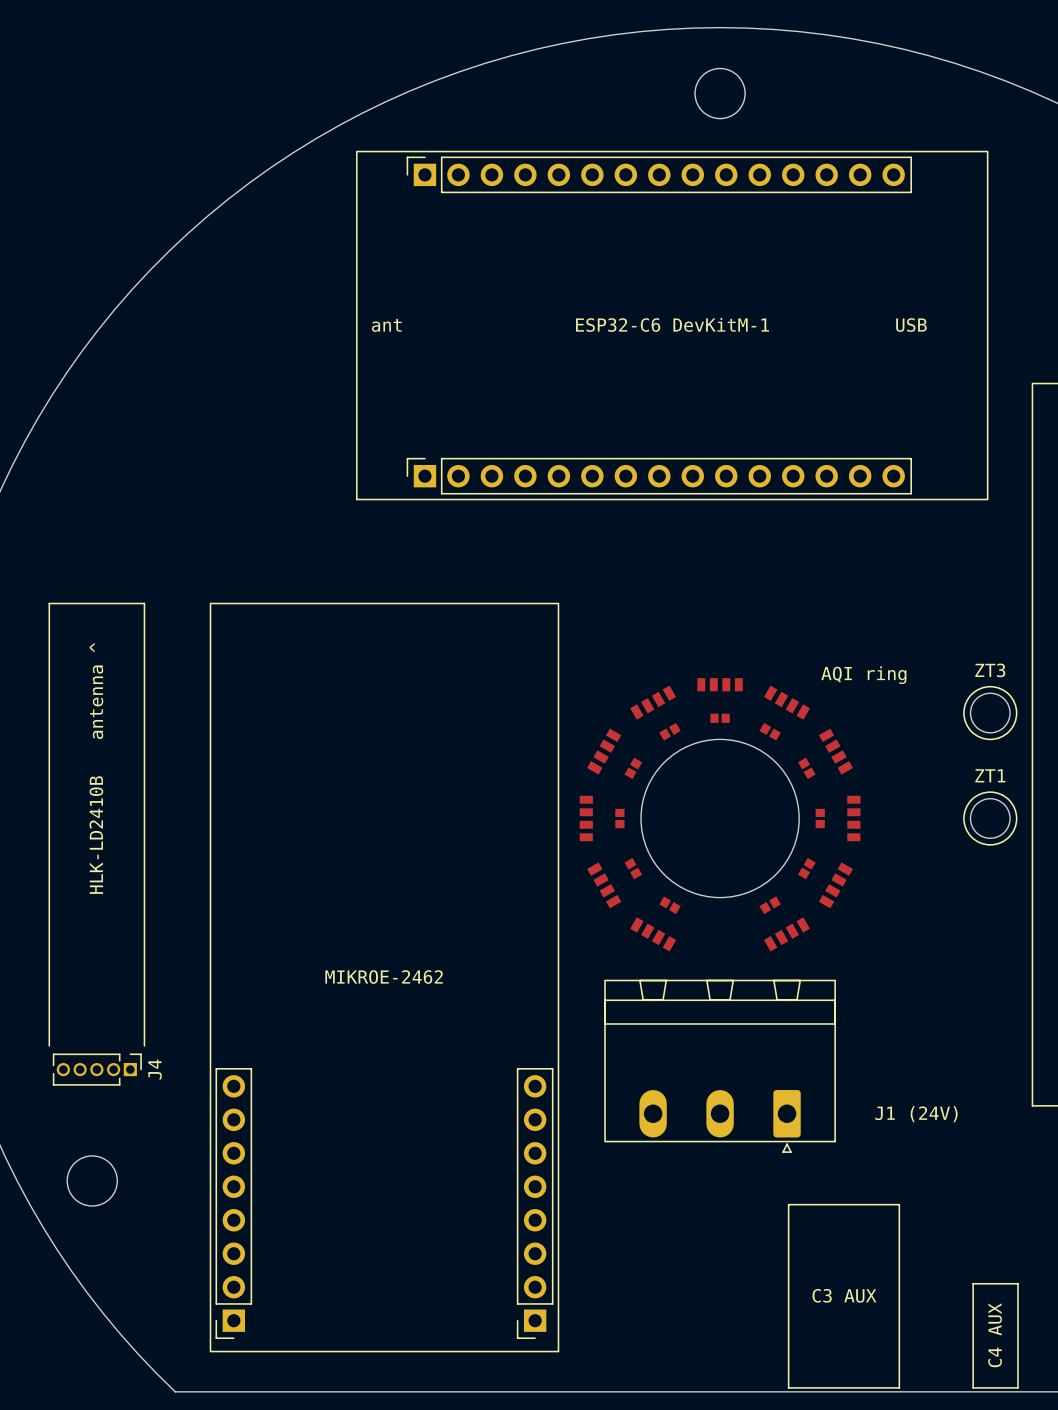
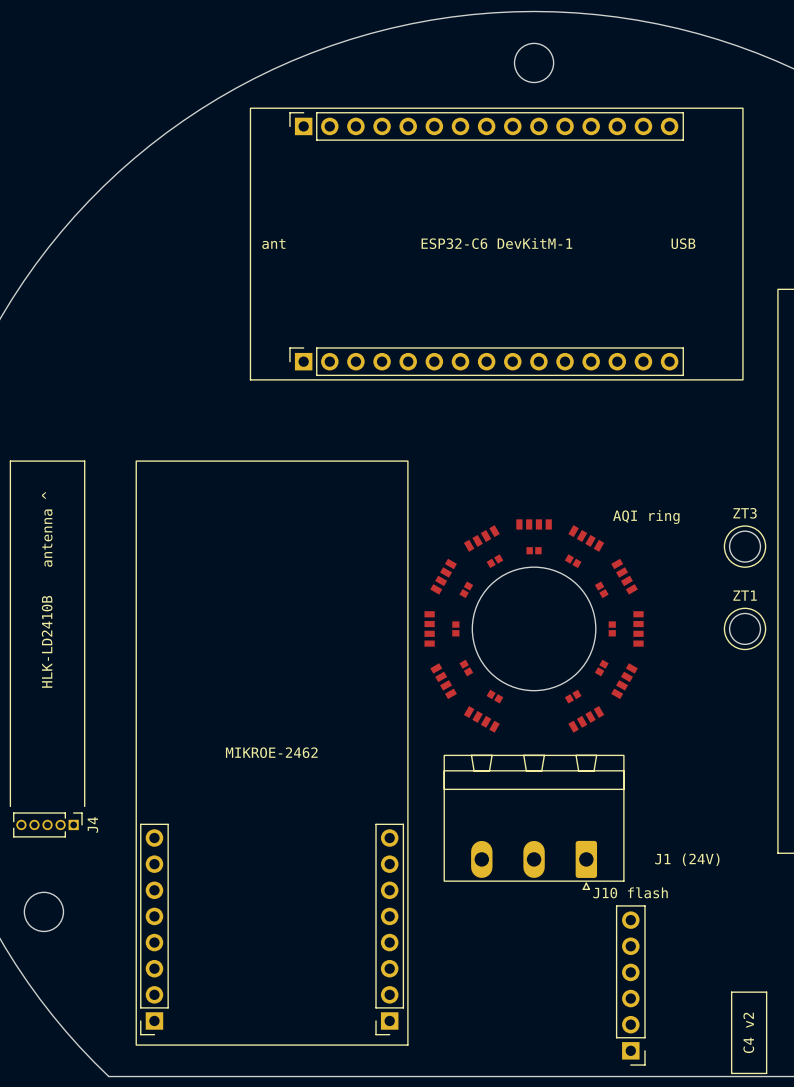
text: none -> J10 flash (630, 892)
line: (788, 1204) (899, 1204) (899, 1387) (788, 1387) (788, 1204) -> none
part: none -> (630, 985)
text: C3 AUX (844, 1295) -> none
text: C4 AUX (995, 1335) -> C4 v2 (748, 1032)

